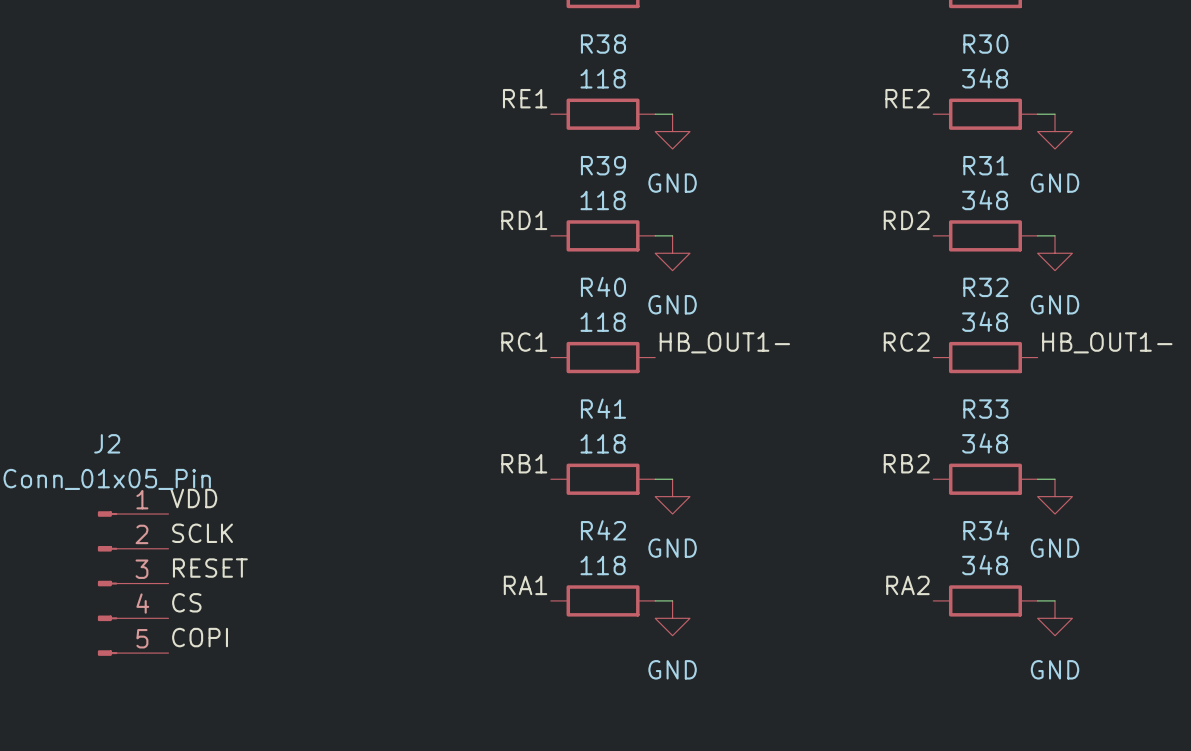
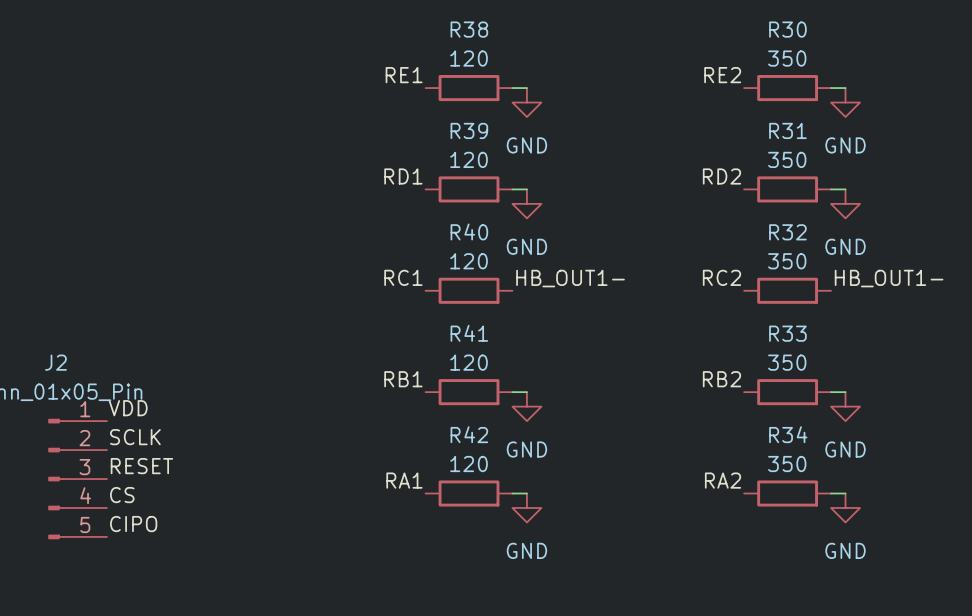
R38 value: 118 (603, 78) -> 120 (469, 58)
R30 value: 348 (985, 78) -> 350 (787, 58)
R39 value: 118 (603, 200) -> 120 (469, 159)
R31 value: 348 (985, 200) -> 350 (787, 159)
R32 value: 348 (985, 321) -> 350 (787, 261)
R40 value: 118 (603, 322) -> 120 (469, 261)
R41 value: 118 (603, 443) -> 120 (469, 362)
R33 value: 348 (985, 443) -> 350 (787, 362)
R42 value: 118 (603, 565) -> 120 (469, 464)
R34 value: 348 (985, 565) -> 350 (787, 464)
label: COPI (200, 637) -> CIPO (133, 524)

